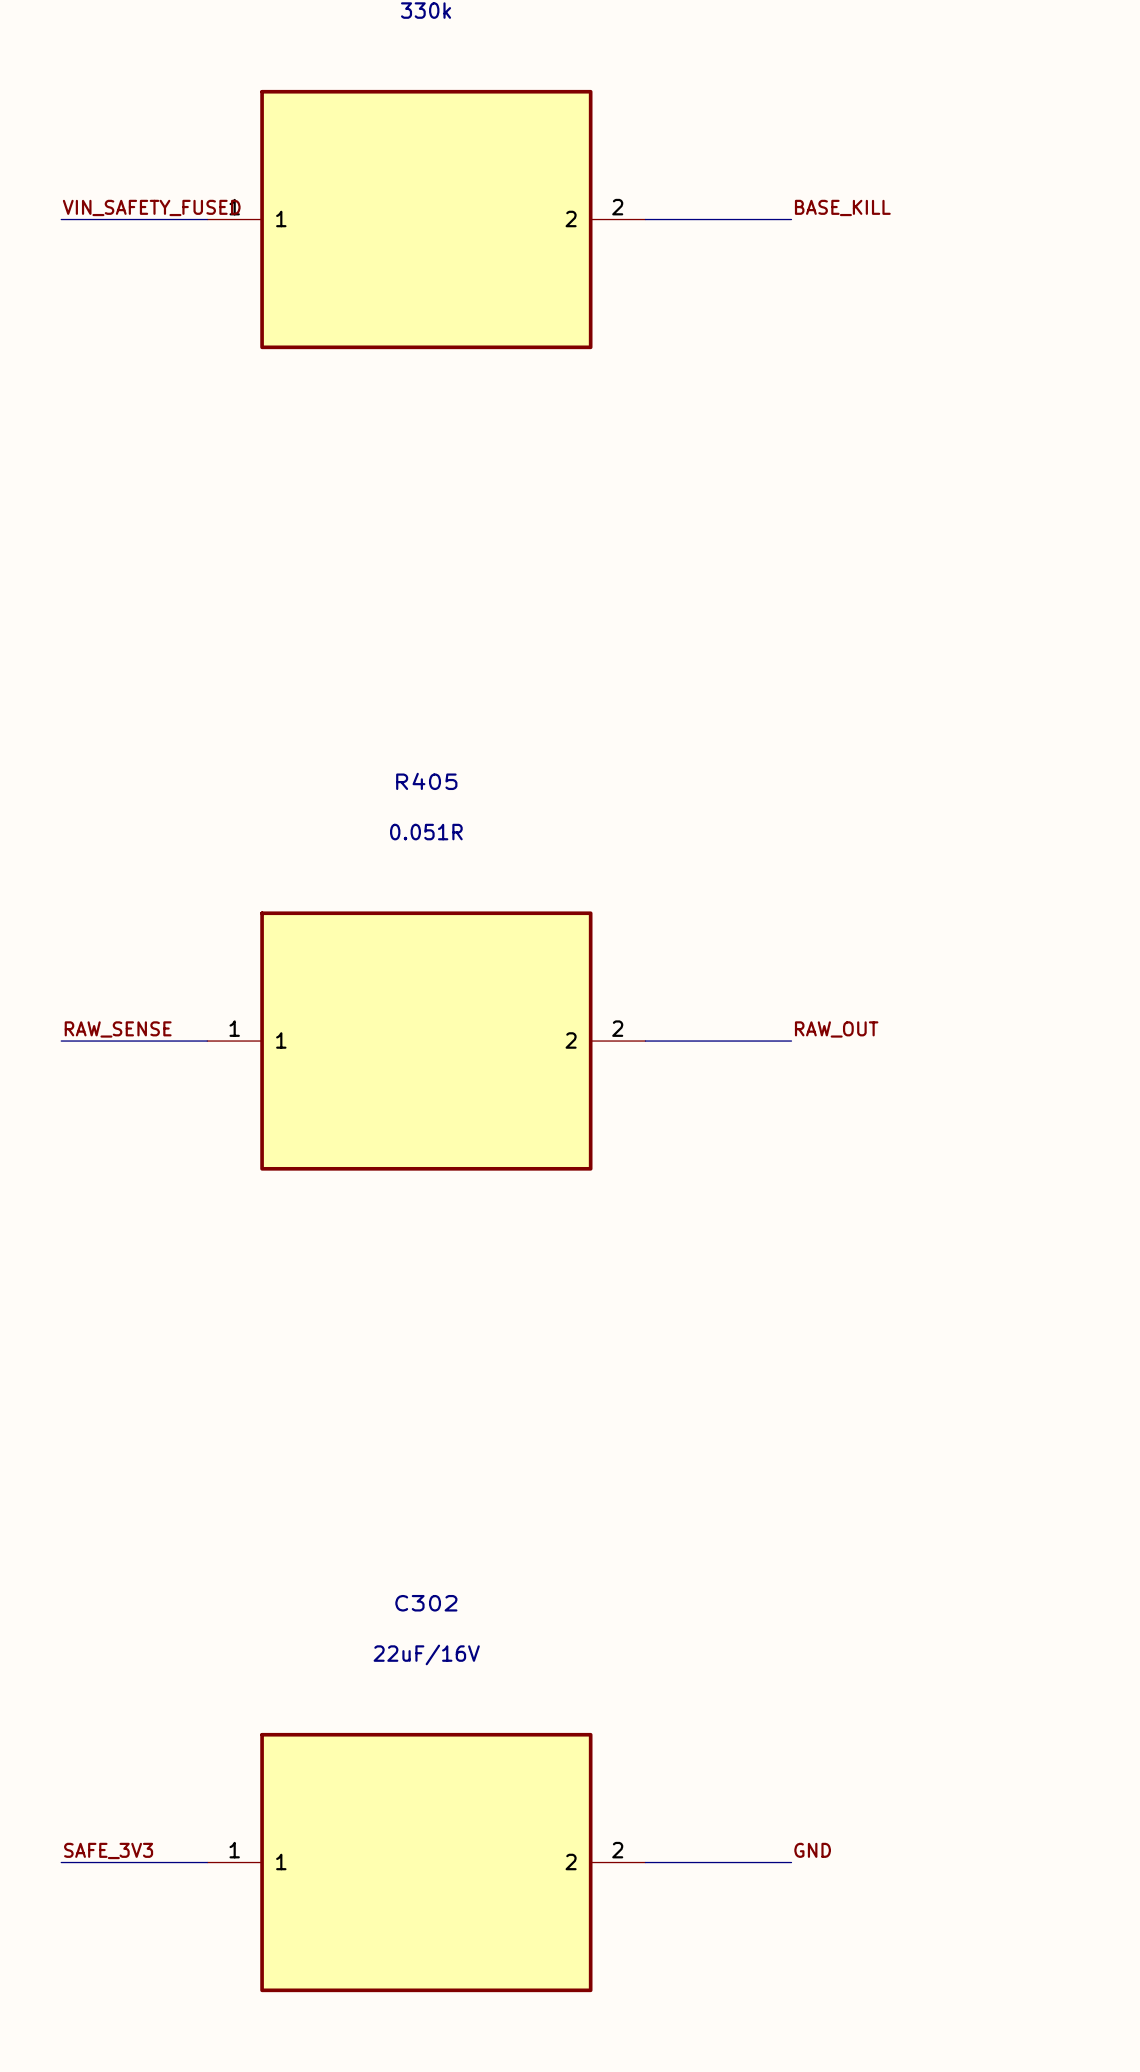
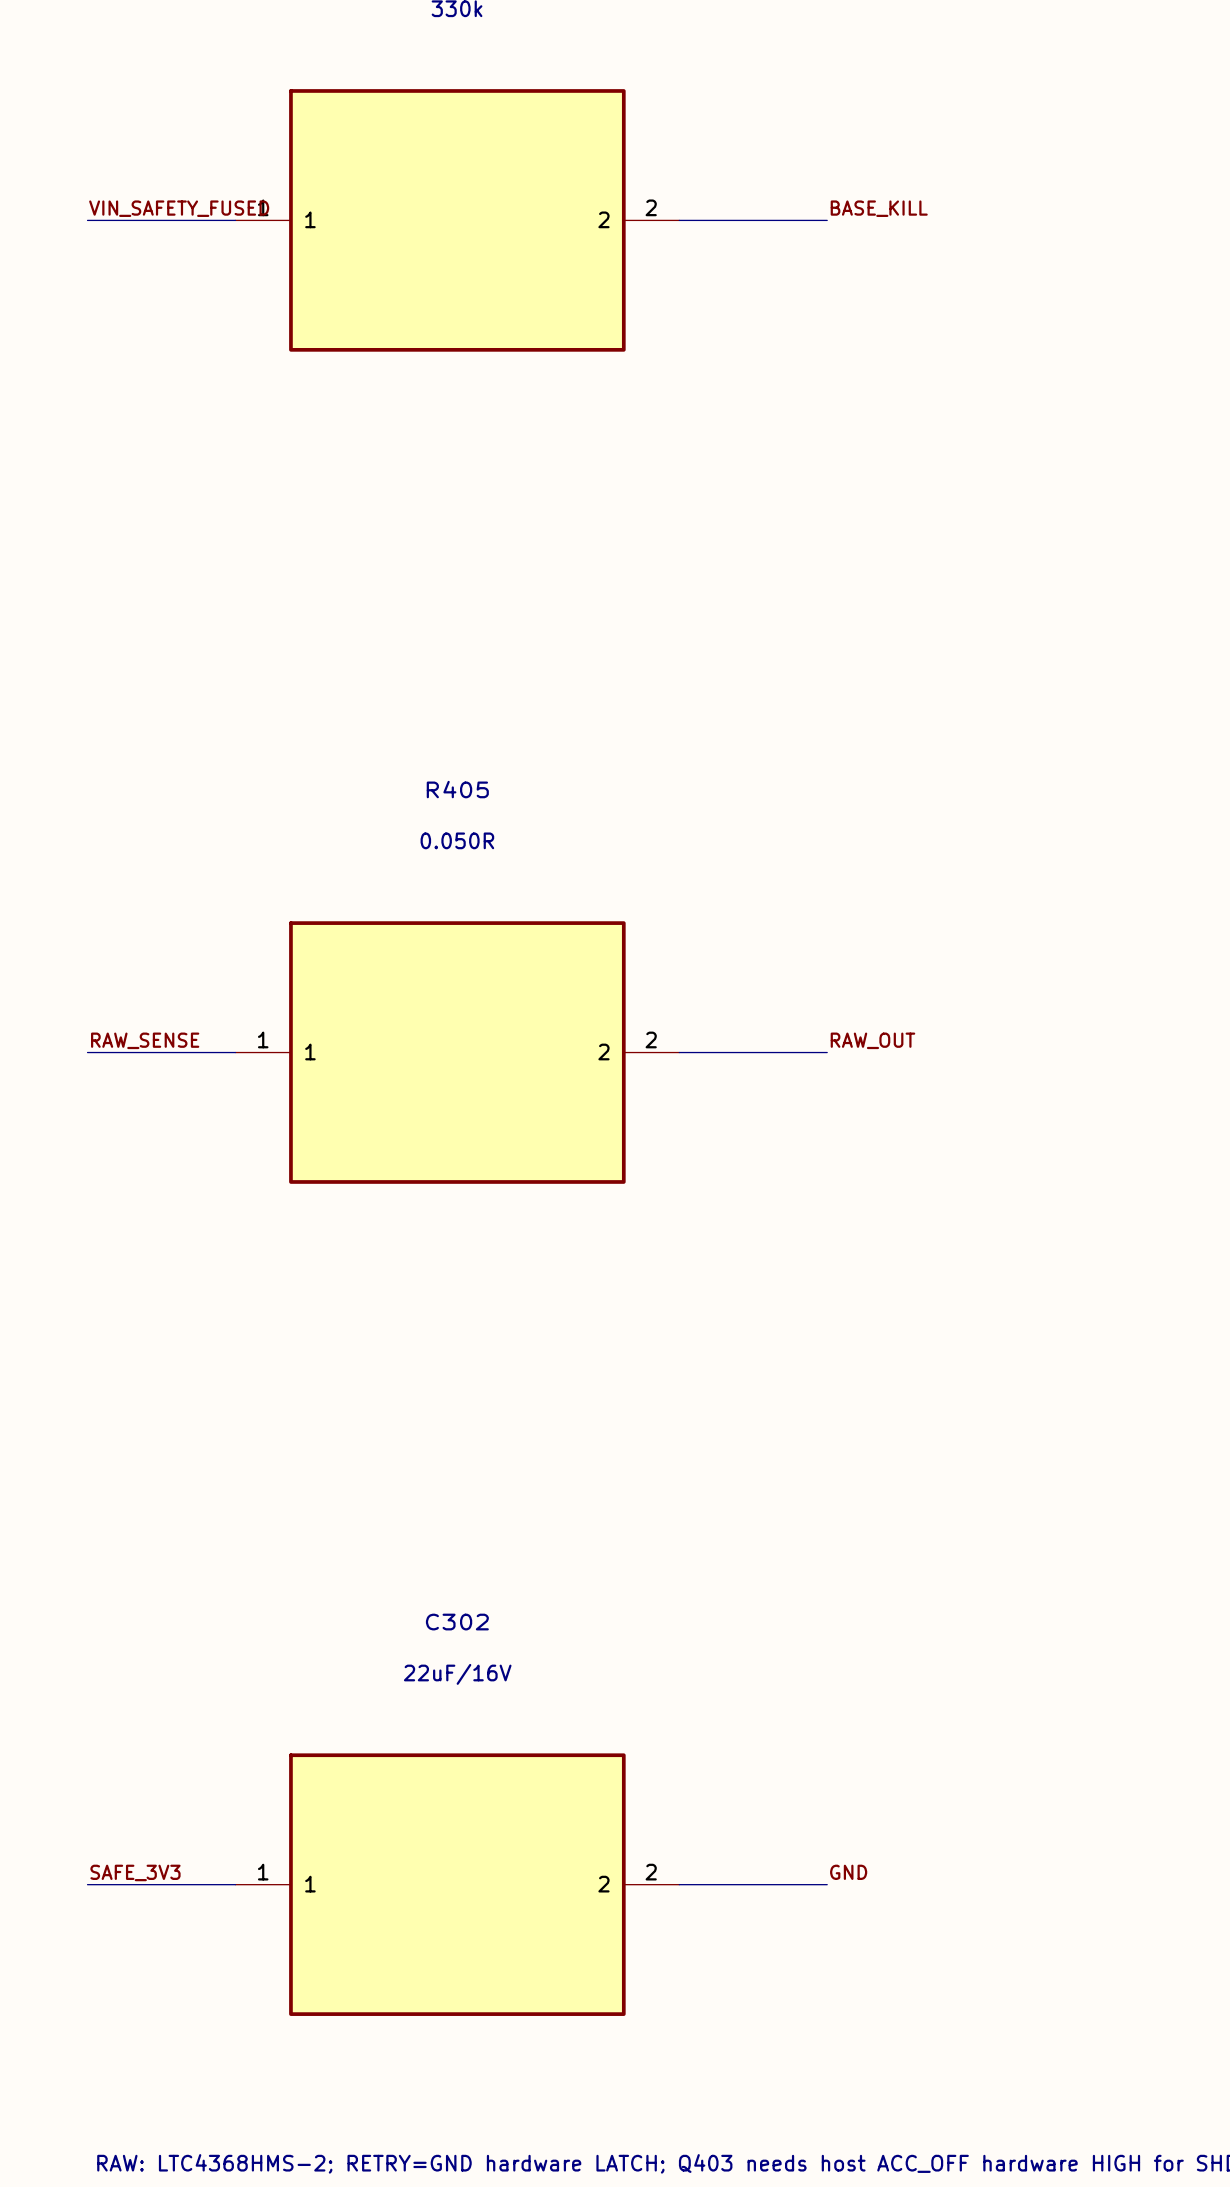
R405 value: 0.051R (426, 832) -> 0.050R (457, 840)

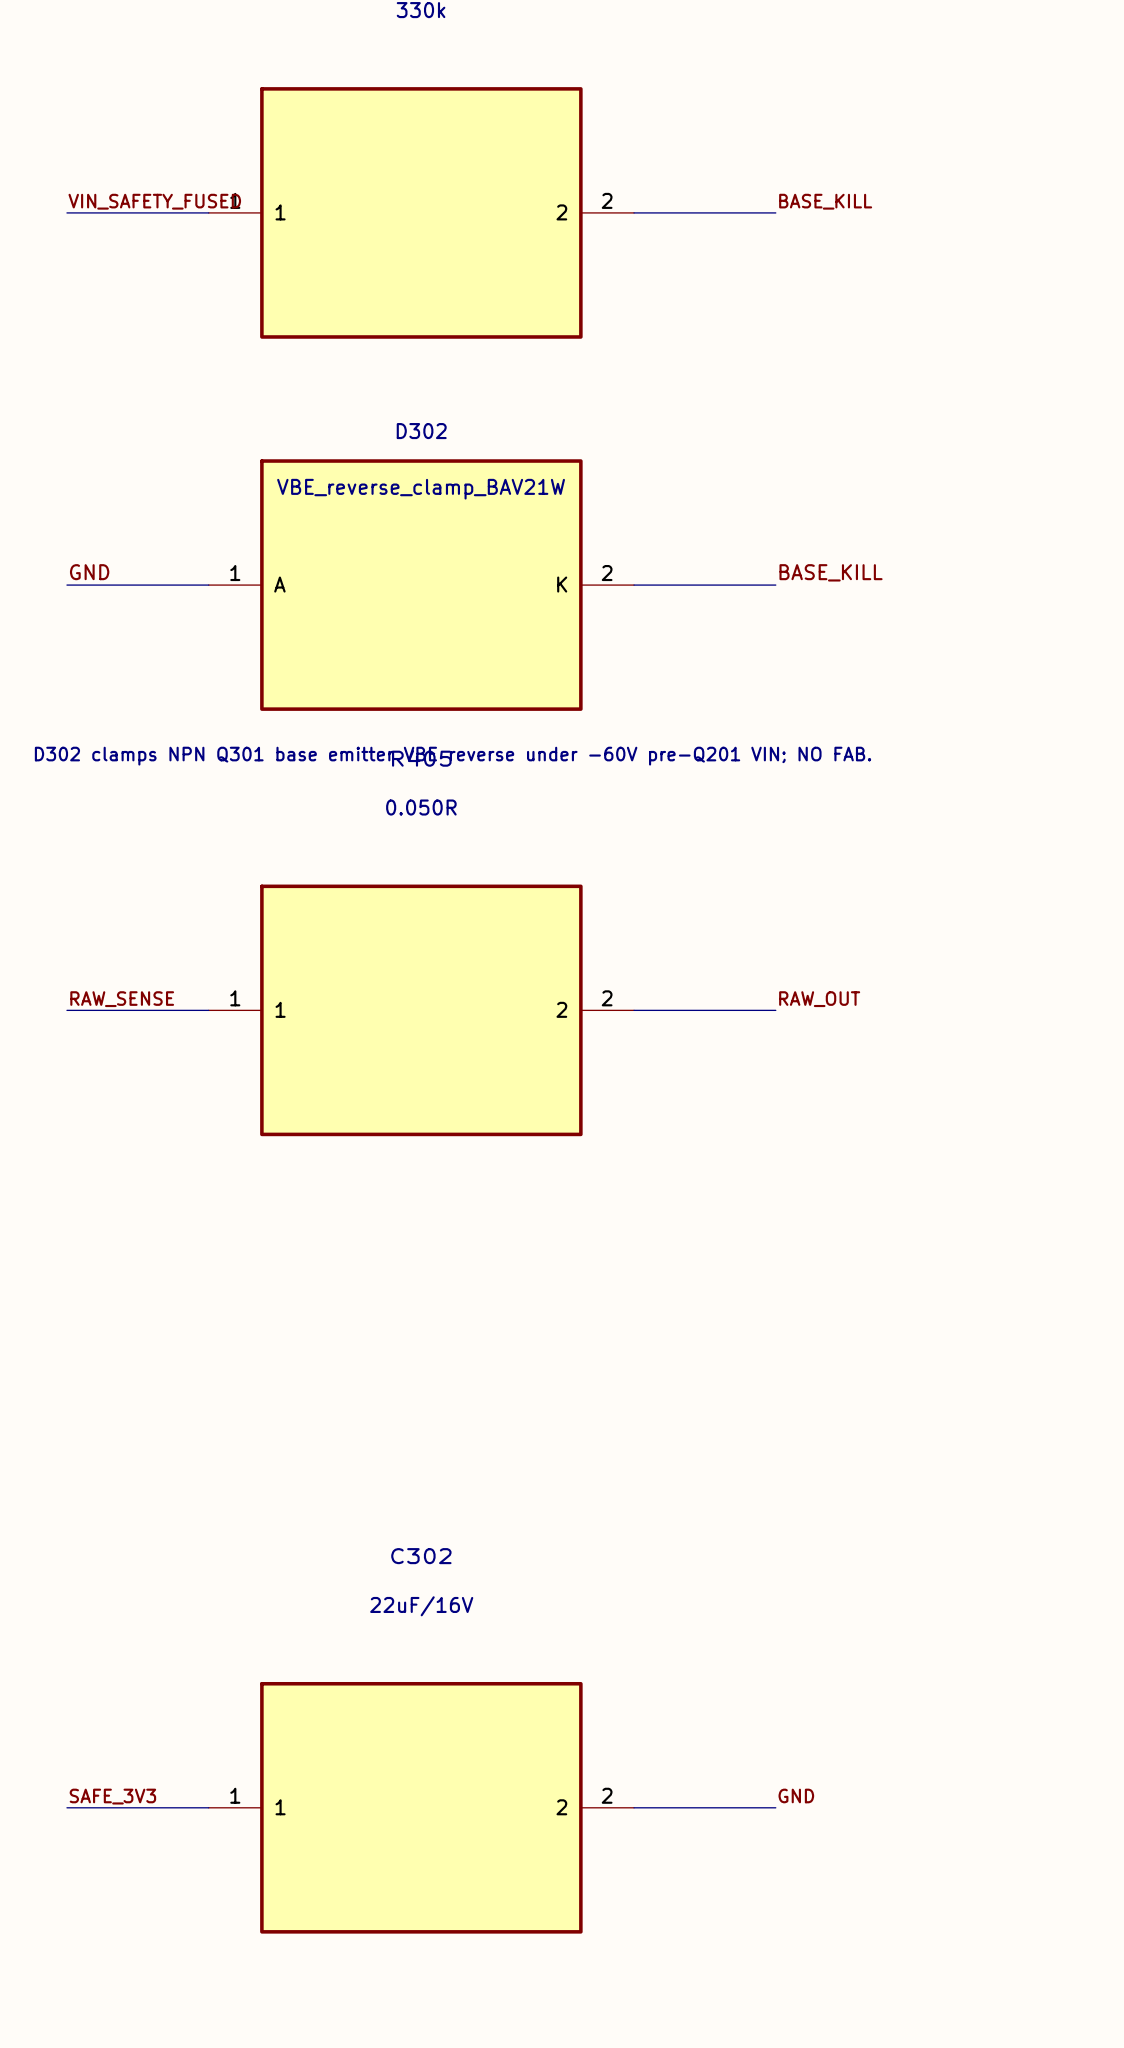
label: none -> GND (89, 572)
label: none -> BASE_KILL (831, 572)
wire: none -> (66, 585) (208, 585)
D302: none -> VBE_reverse_clamp_BAV21W (421, 585)
wire: none -> (634, 585) (775, 585)
text: none -> D302 clamps NPN Q301 base emitter VBE reverse under -60V pre-Q201 VIN; NO FAB. (453, 756)

